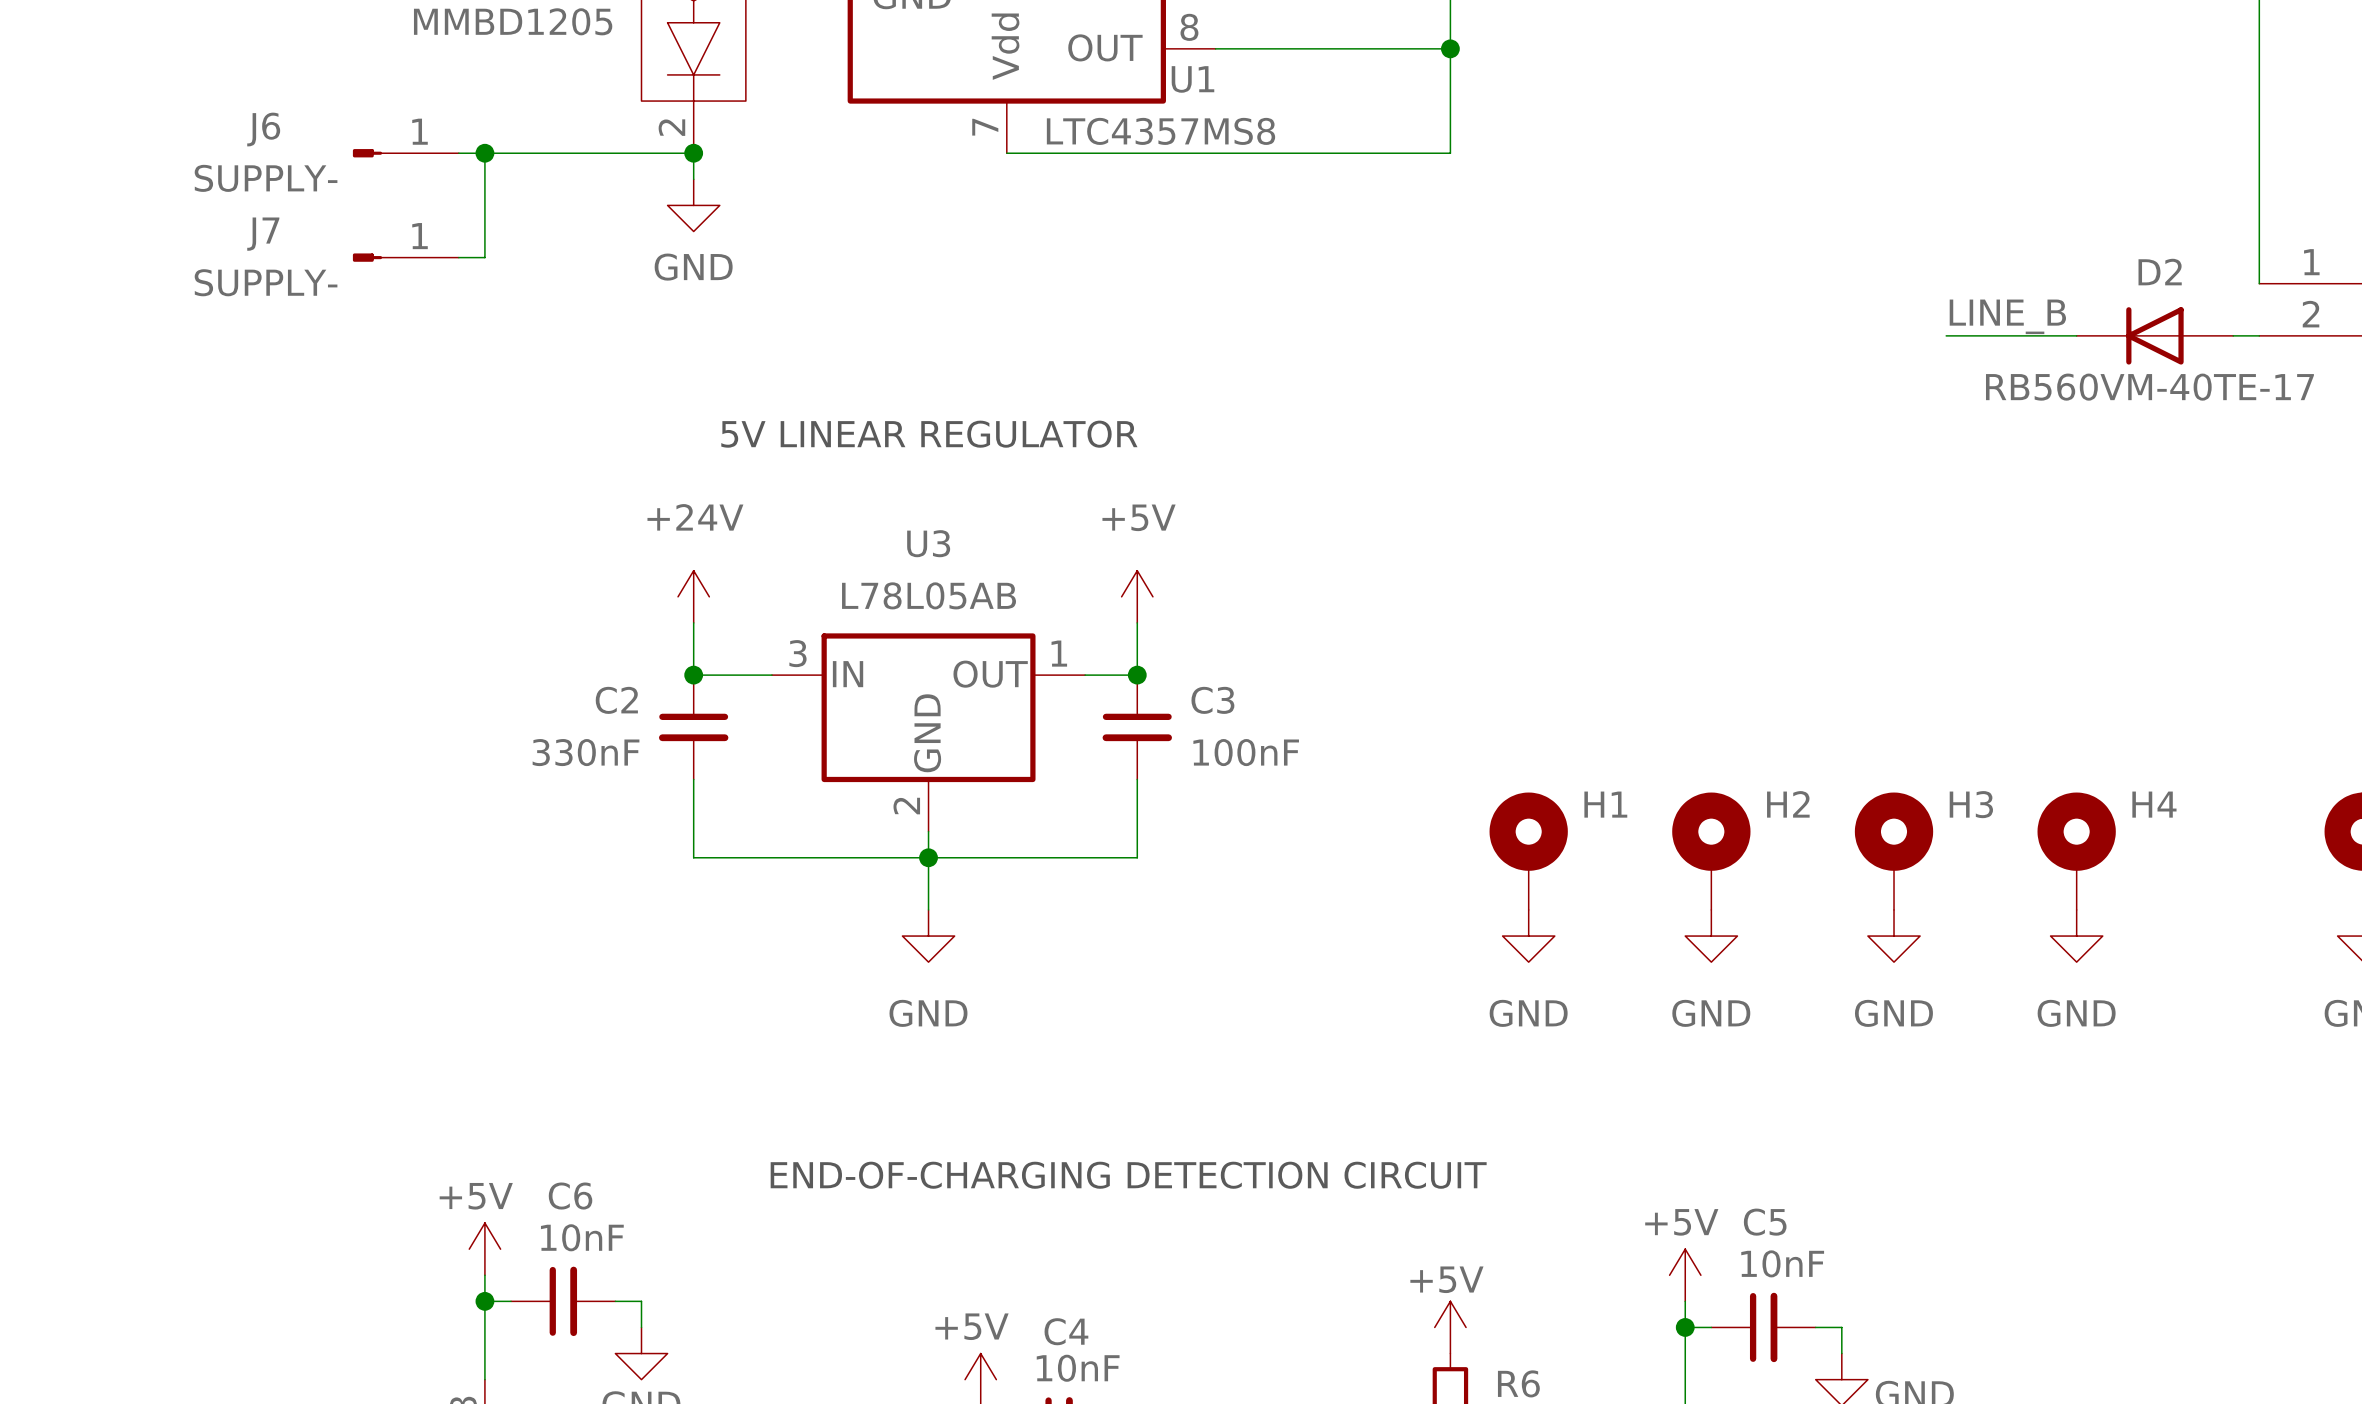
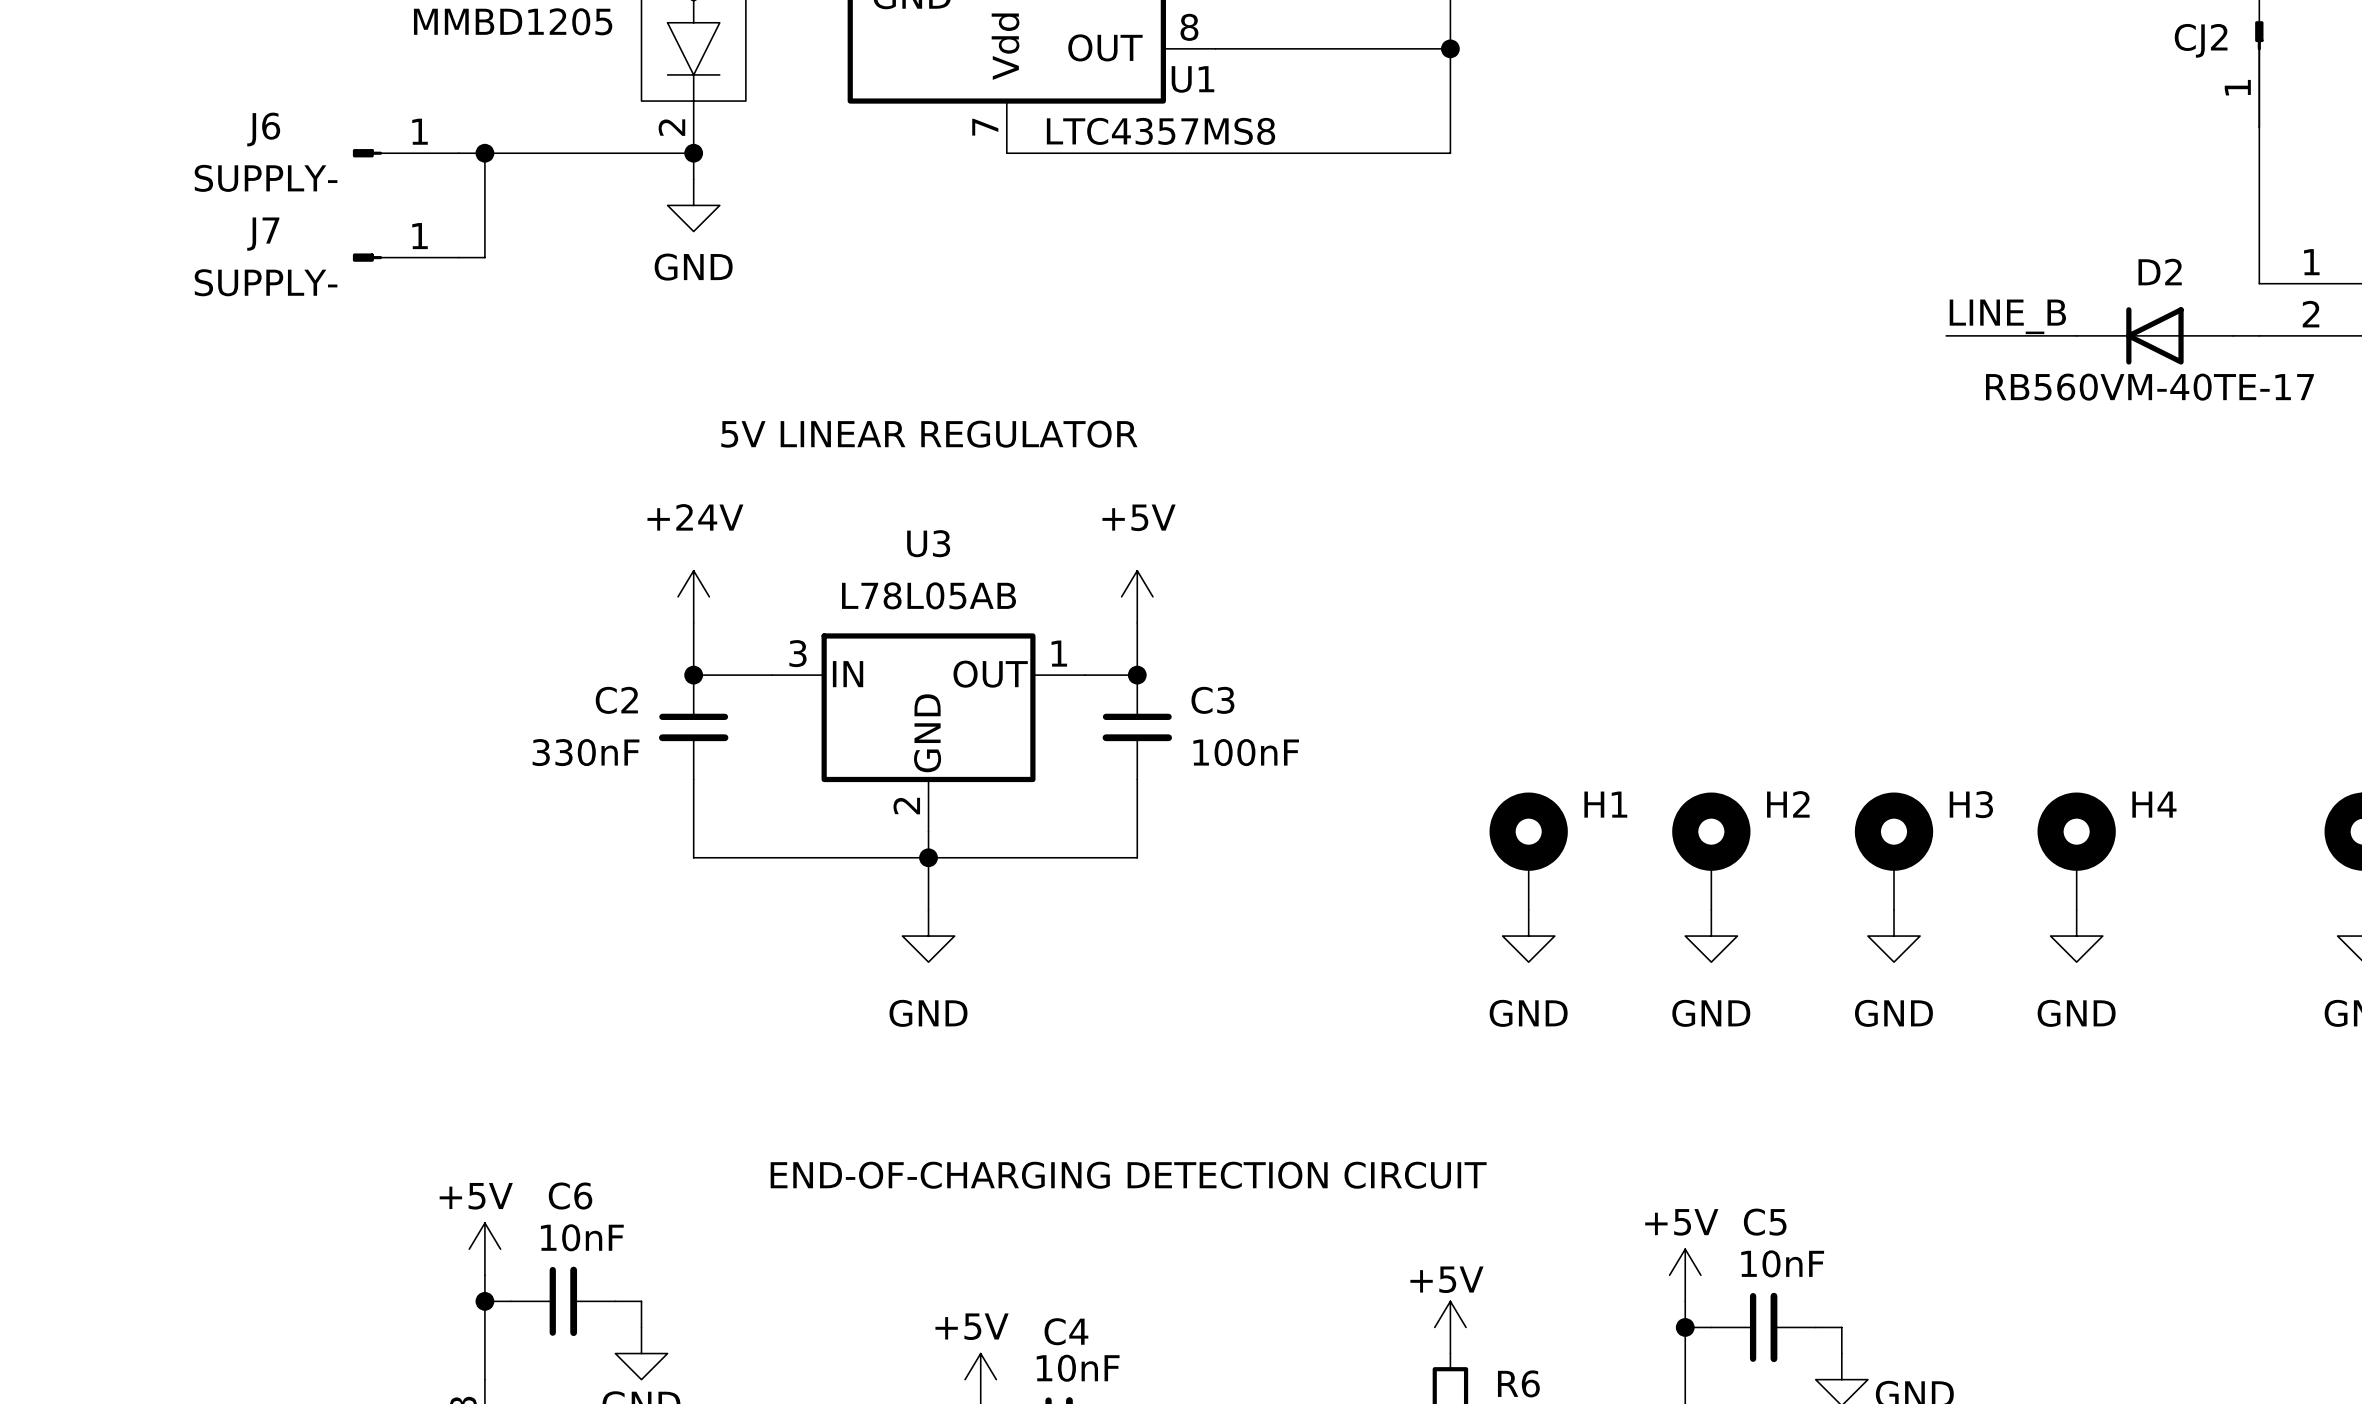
CJ2: none -> (2259, 74)

